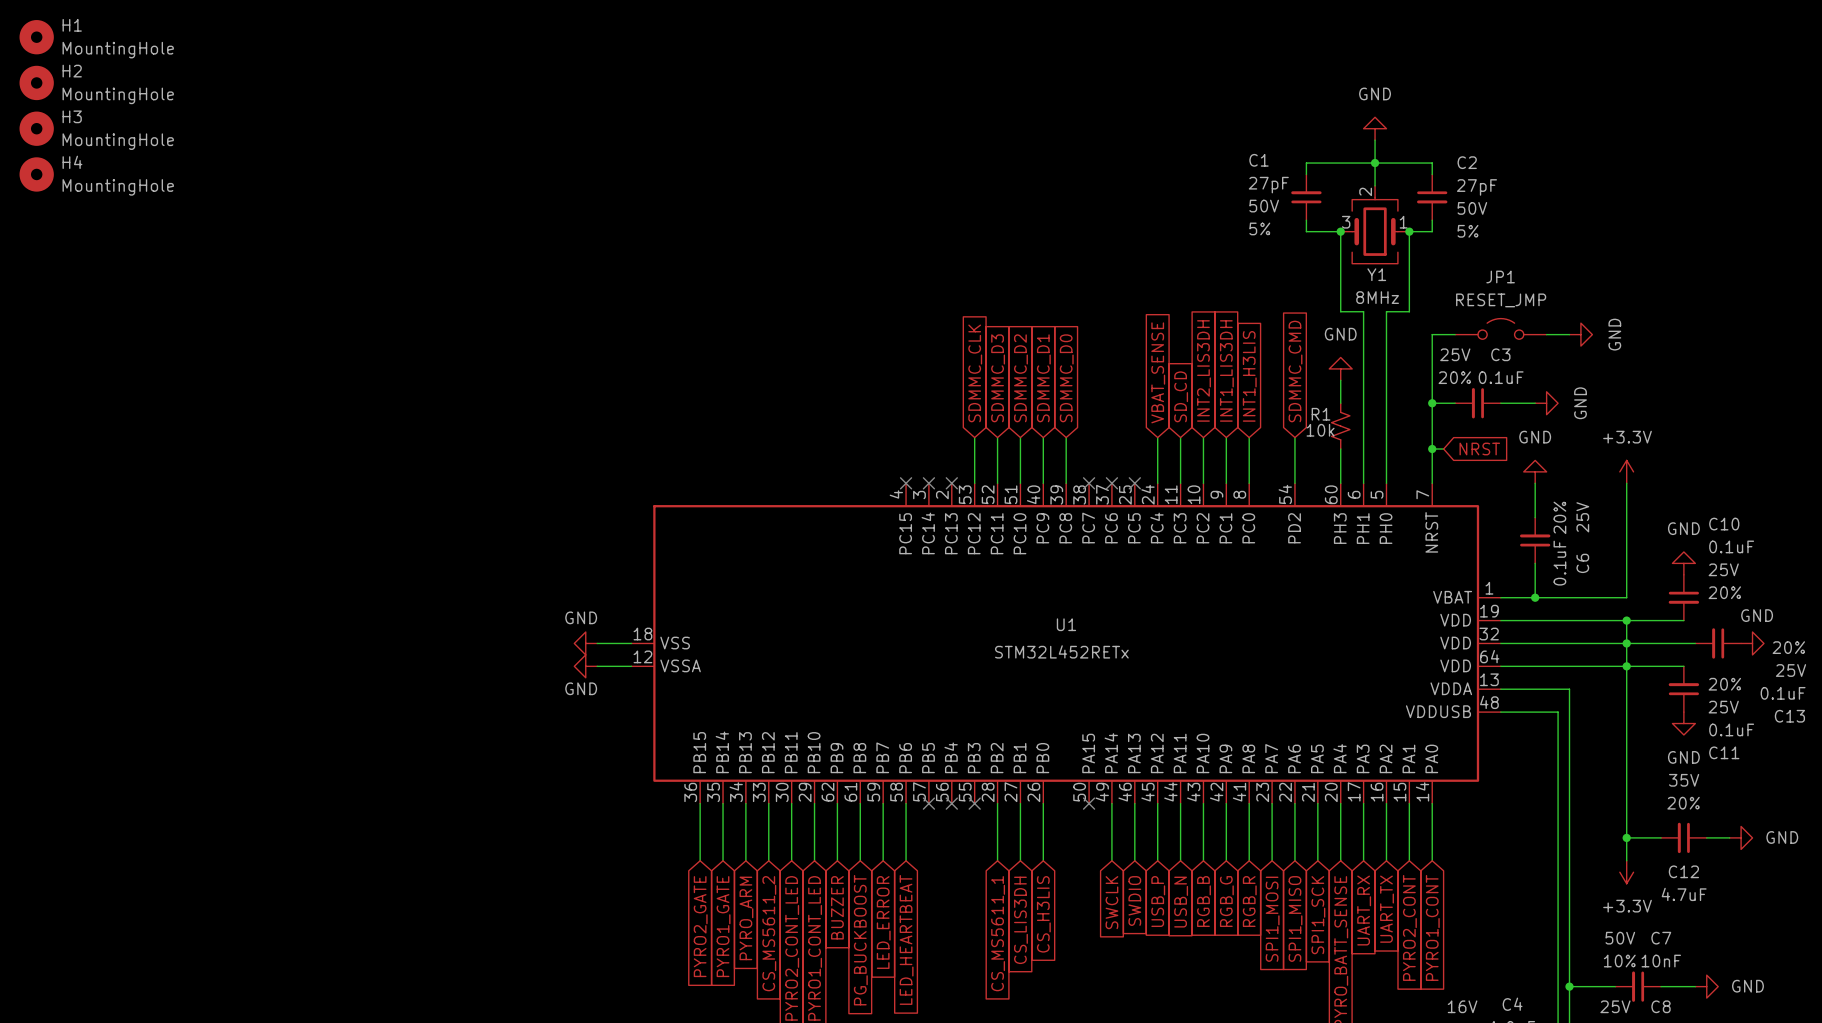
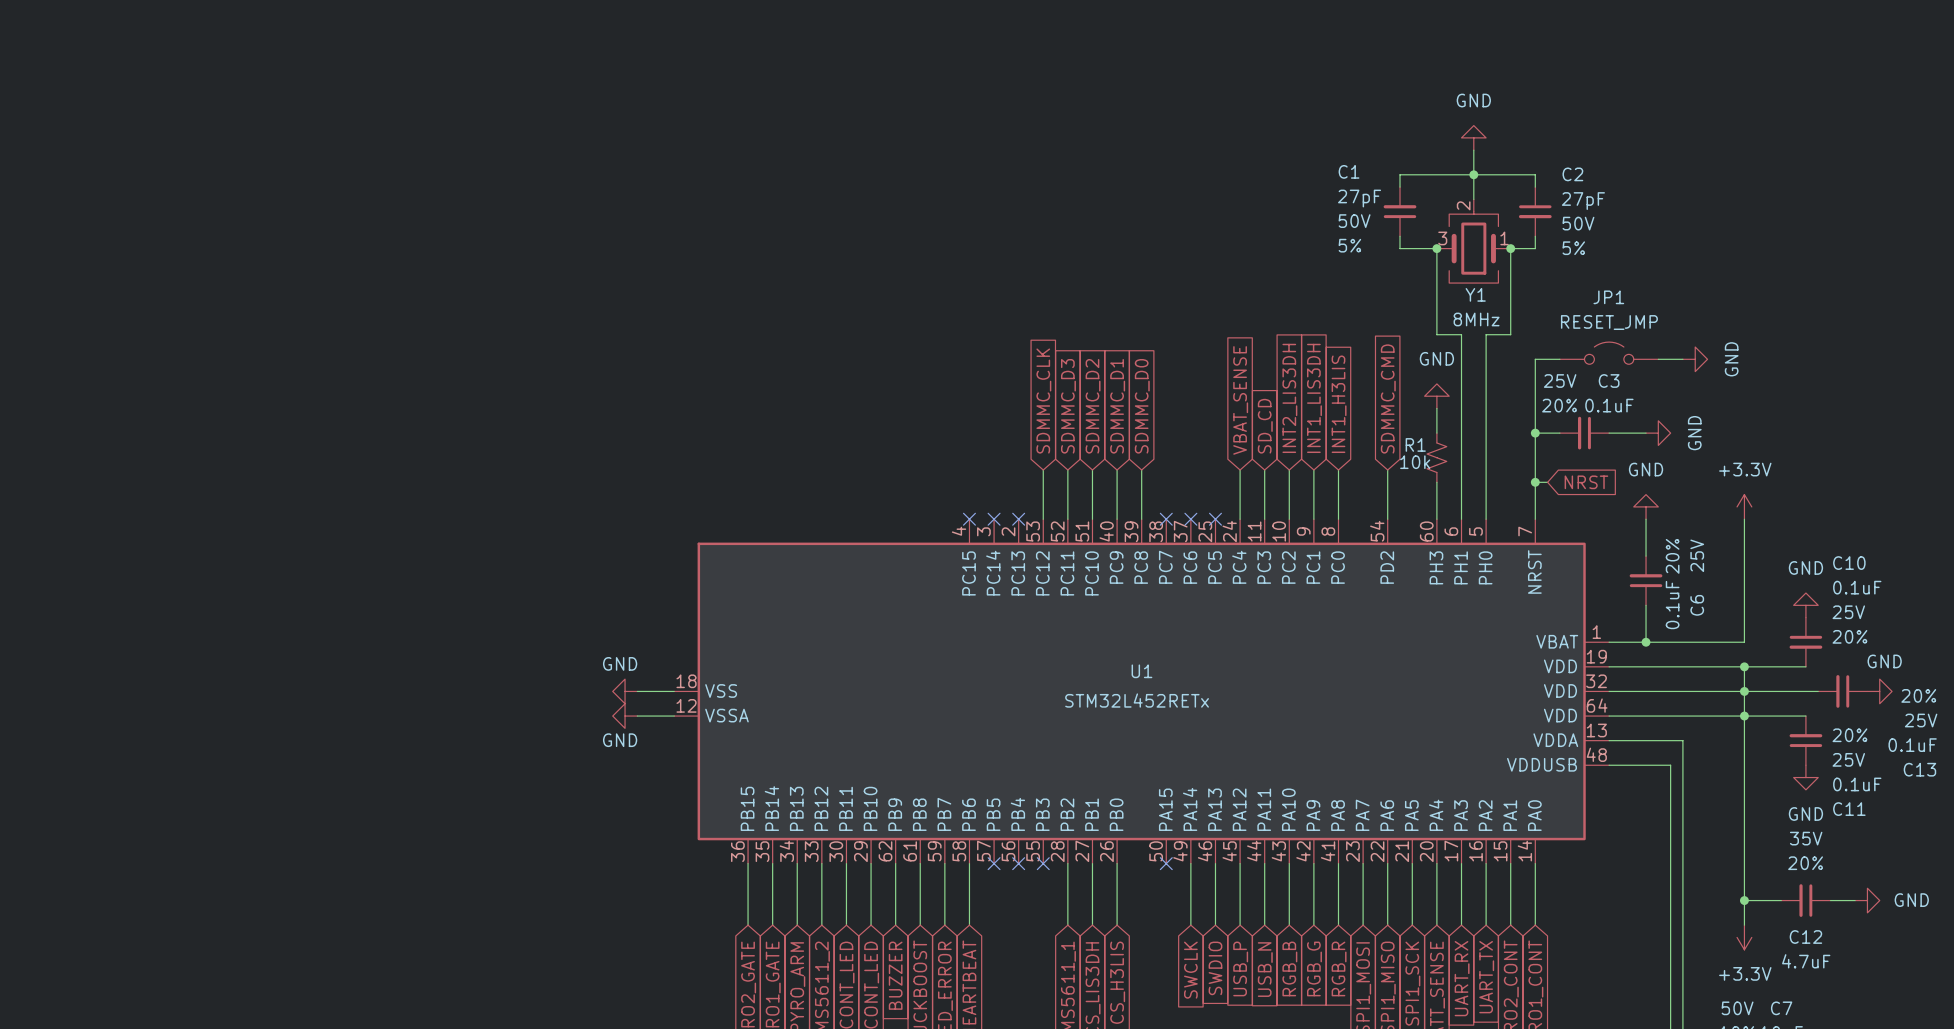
H1: MountingHole (36, 37) -> none
H2: MountingHole (36, 82) -> none
H3: MountingHole (36, 128) -> none
H4: MountingHole (36, 174) -> none

